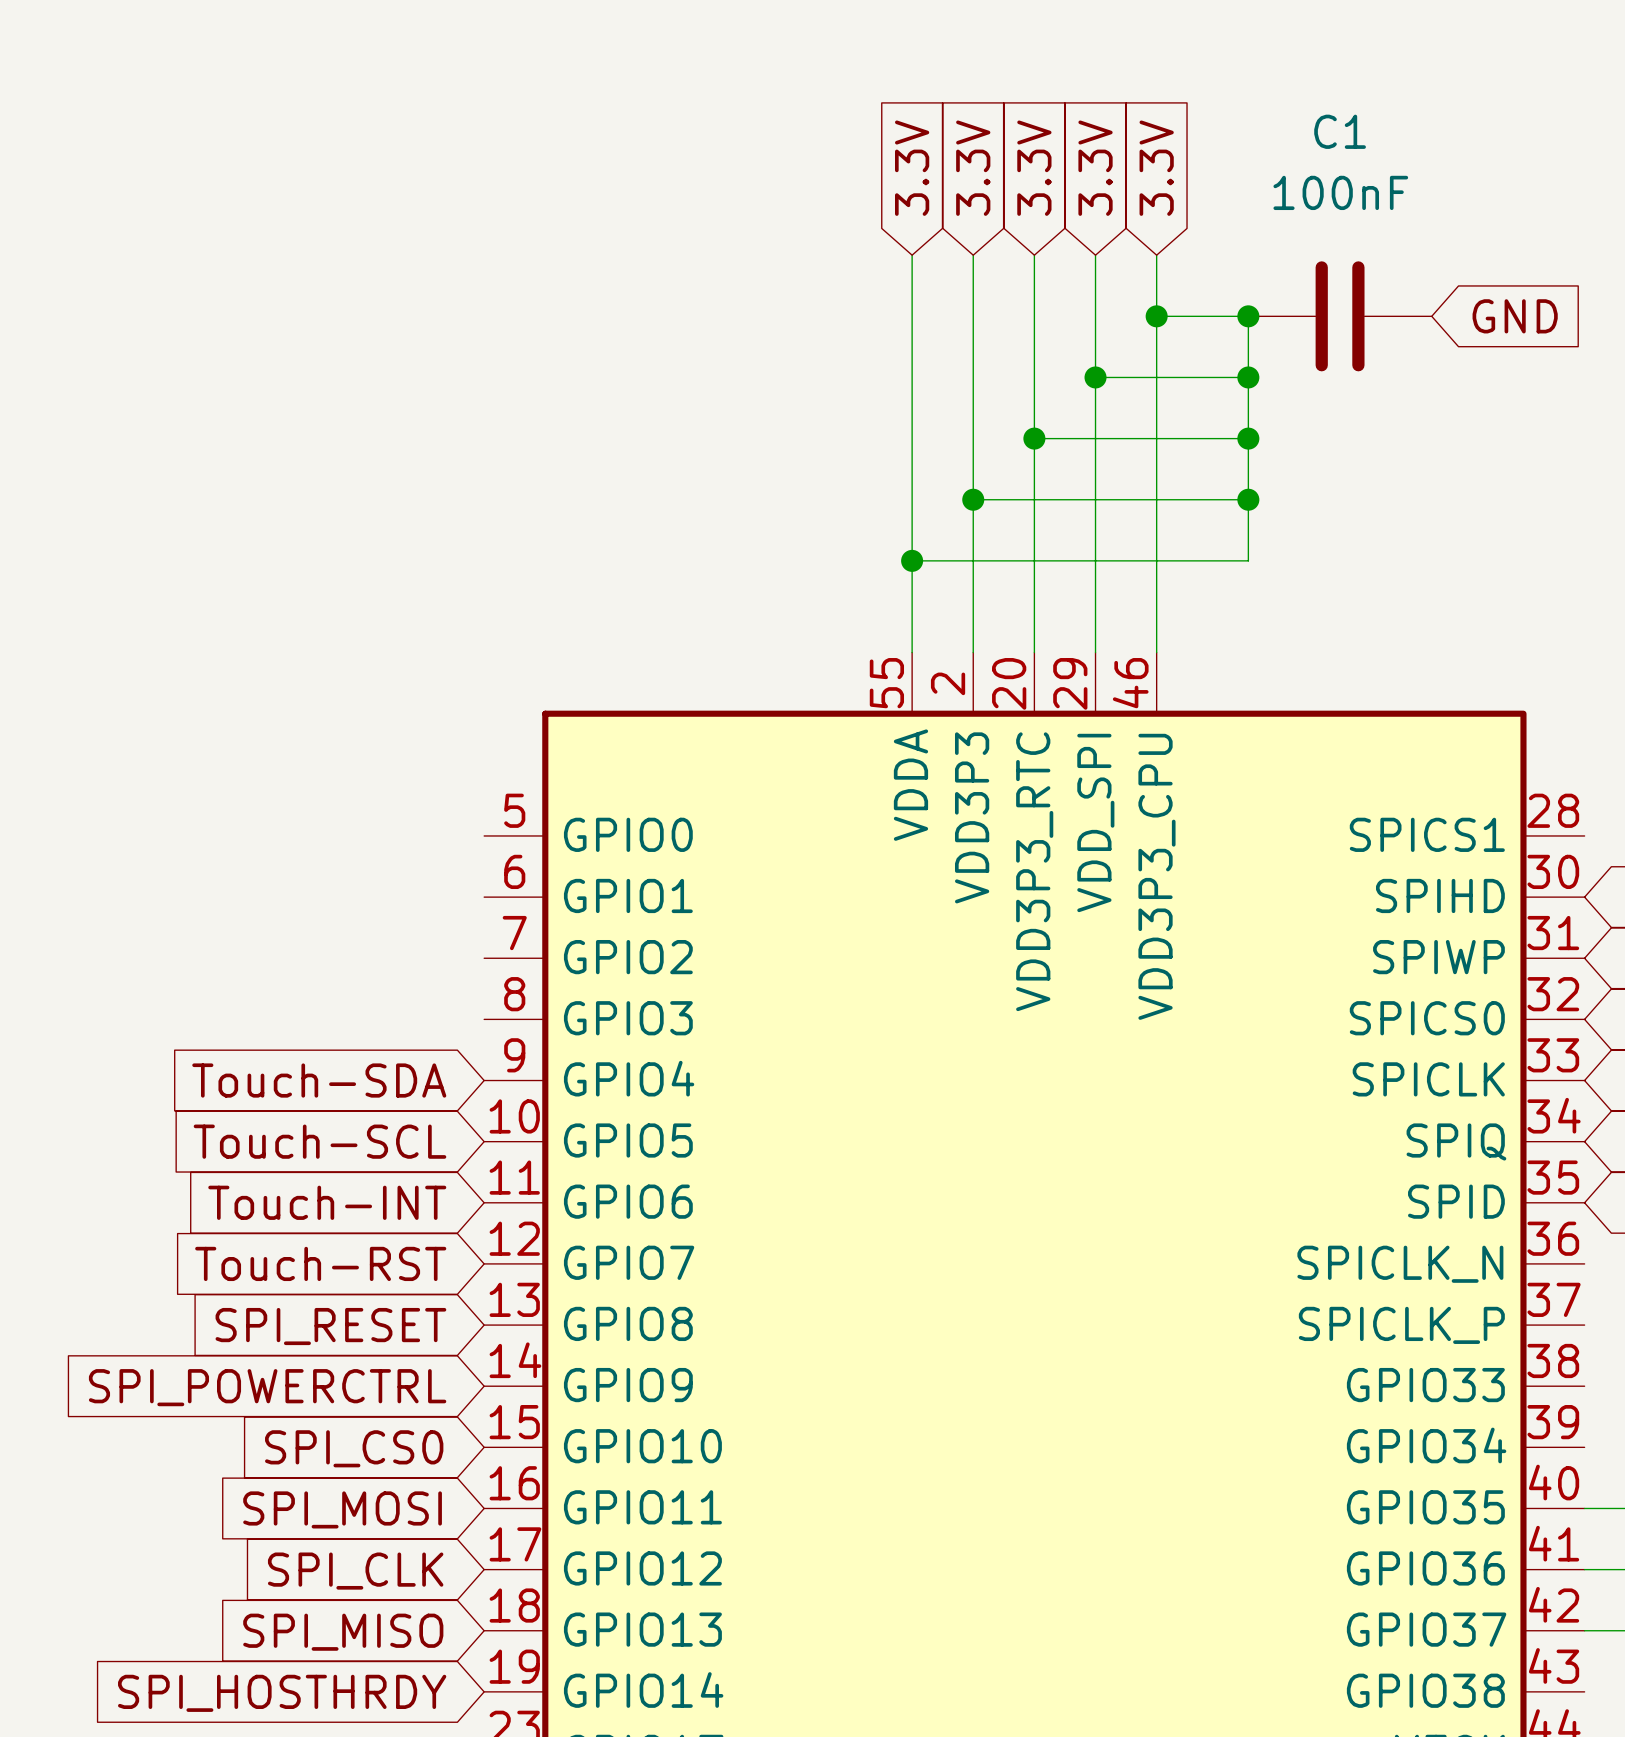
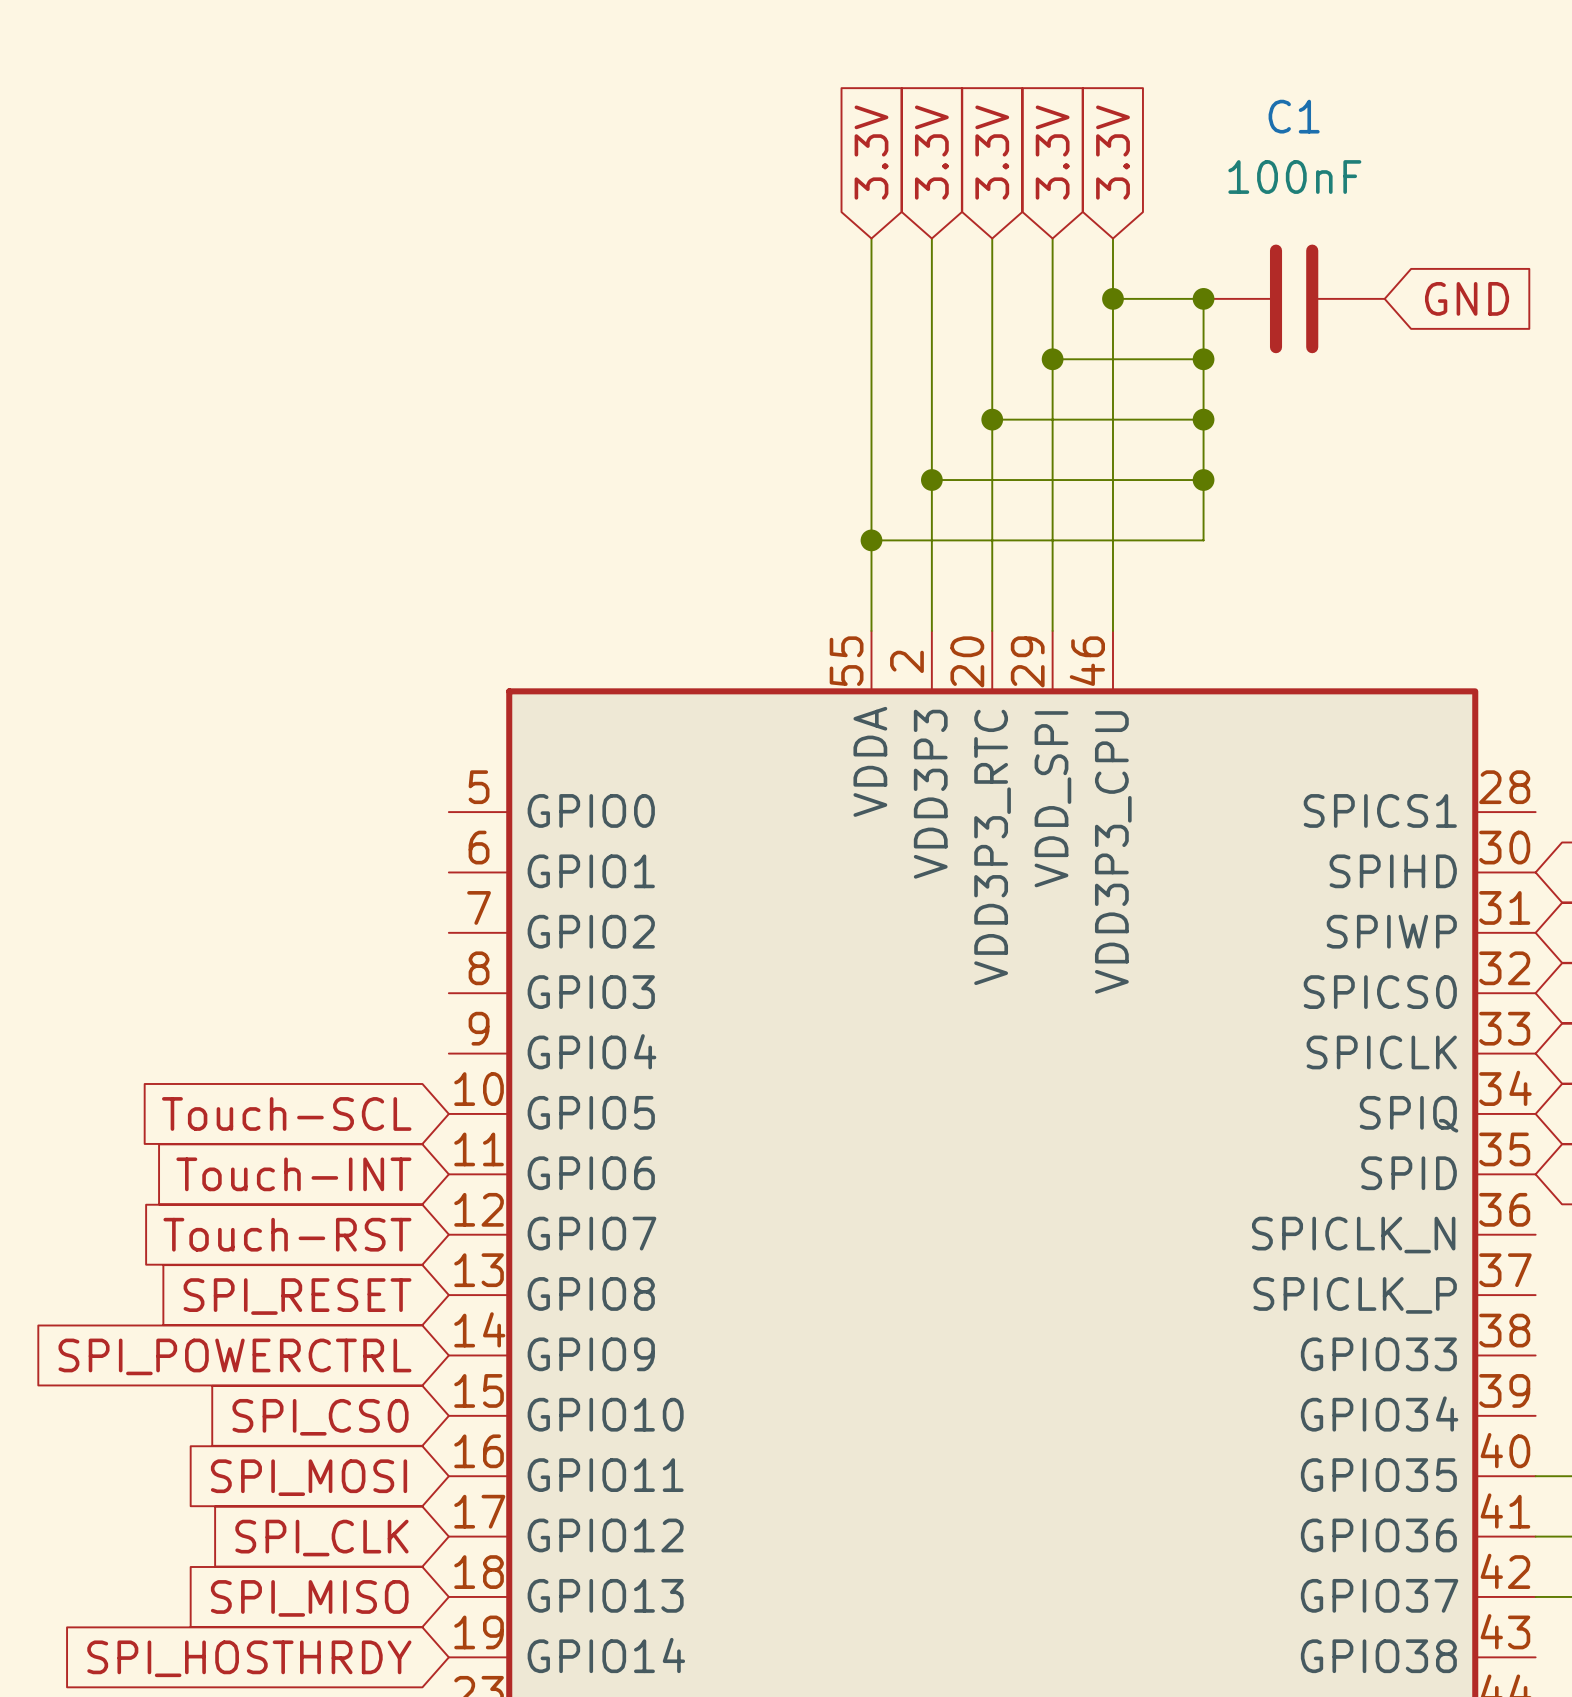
global label: Touch-SDA (319, 1080) -> none

